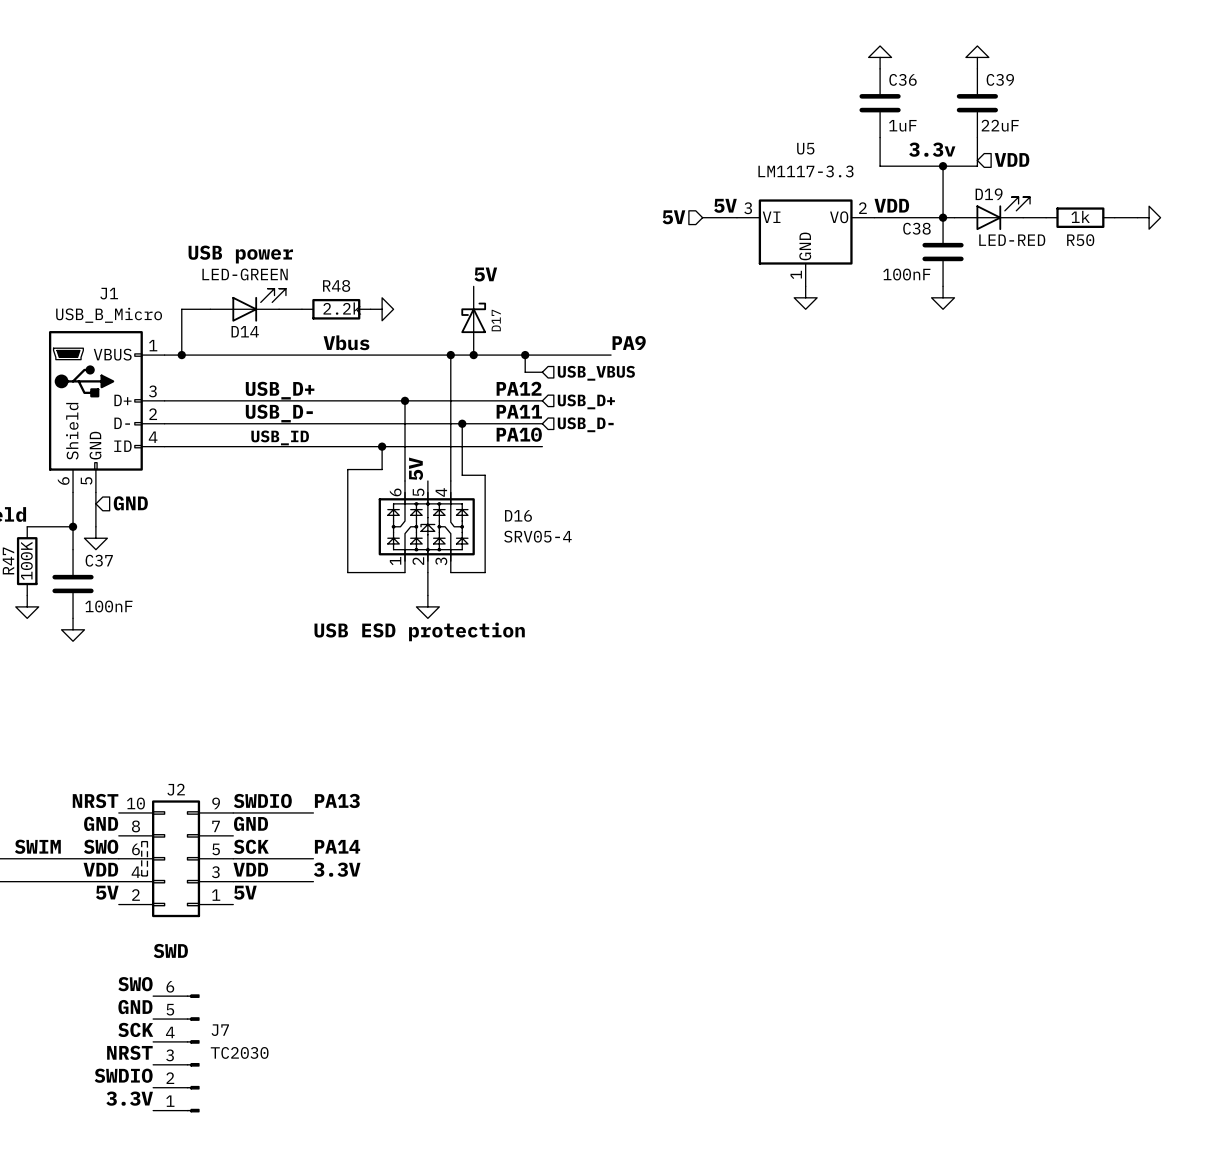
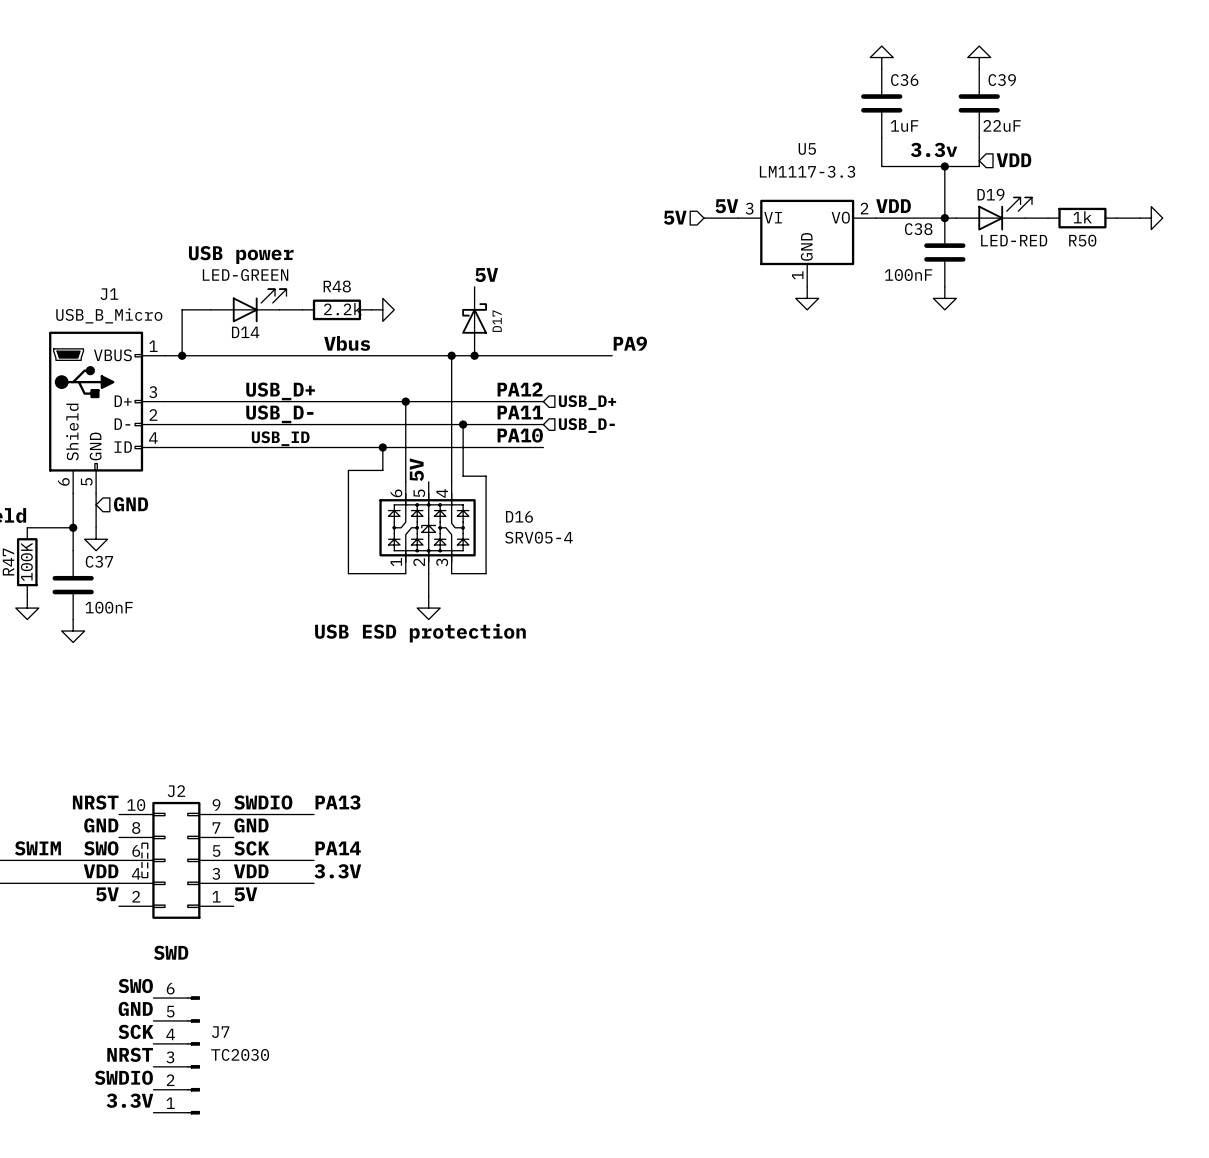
wire: (525, 355) (525, 372) (542, 372) -> none
junction: (525, 355) -> none
hierarchical label: USB_VBUS (596, 373) -> none

